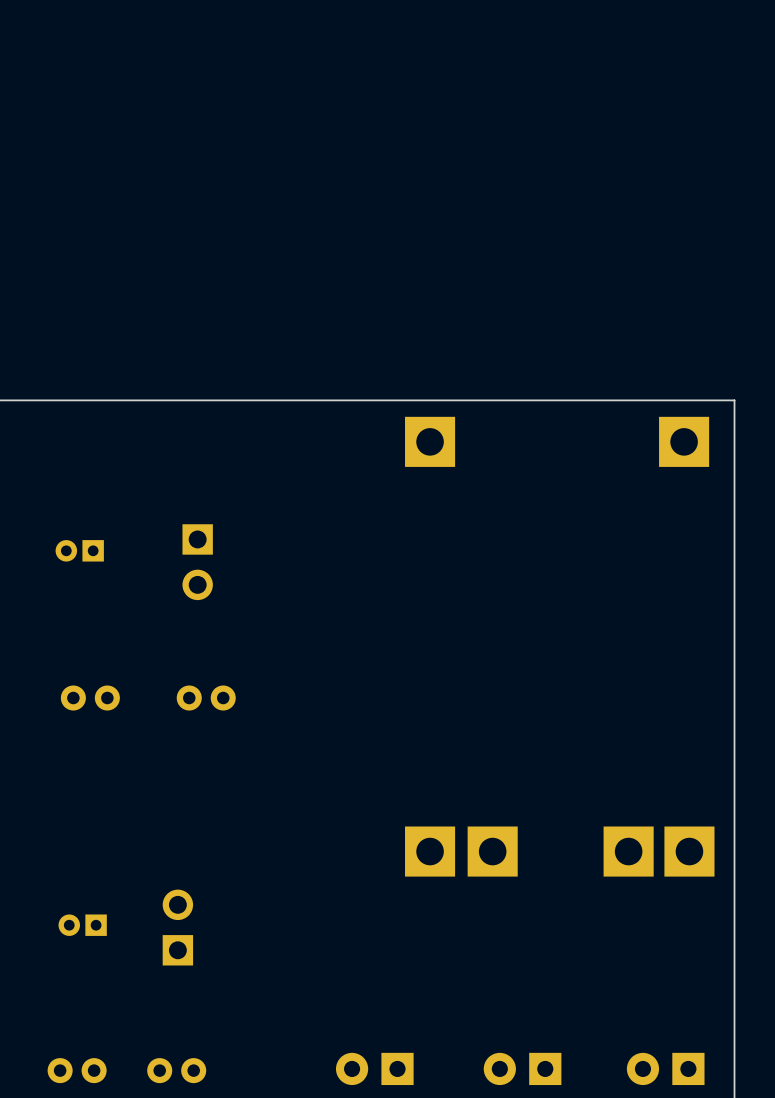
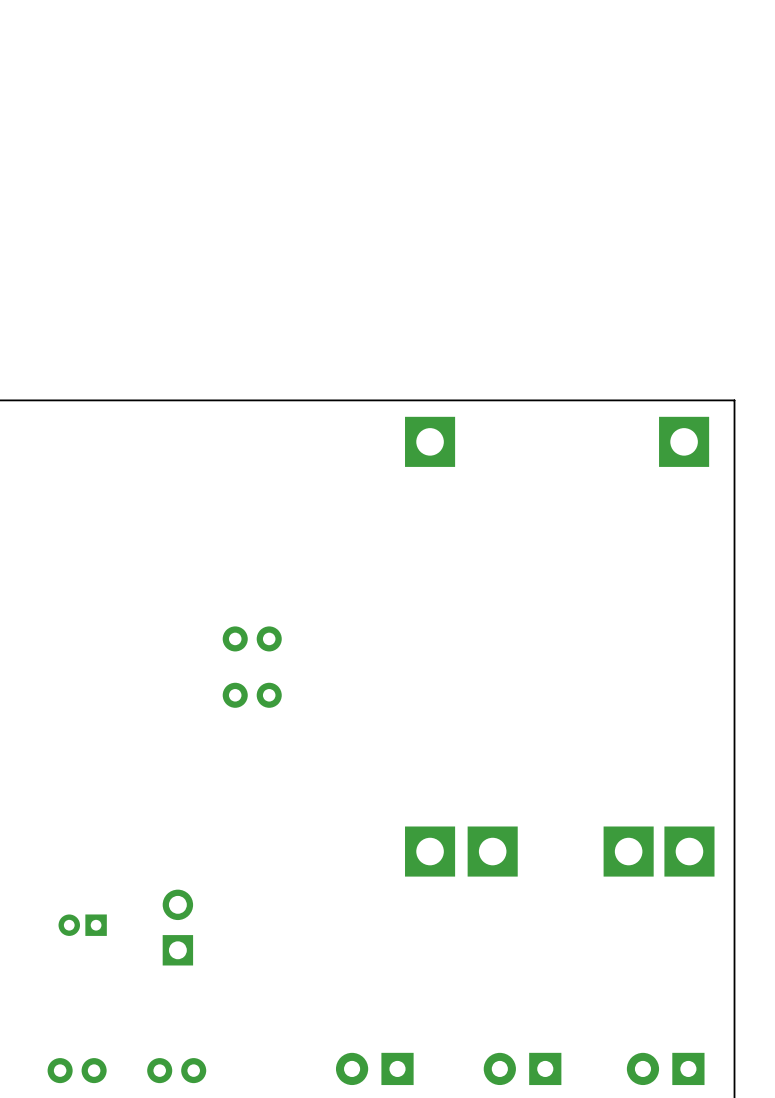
part: (79, 550) -> none
part: (197, 562) -> none
part: none -> (252, 638)
part: none -> (252, 695)
part: (90, 698) -> none
part: (206, 698) -> none

